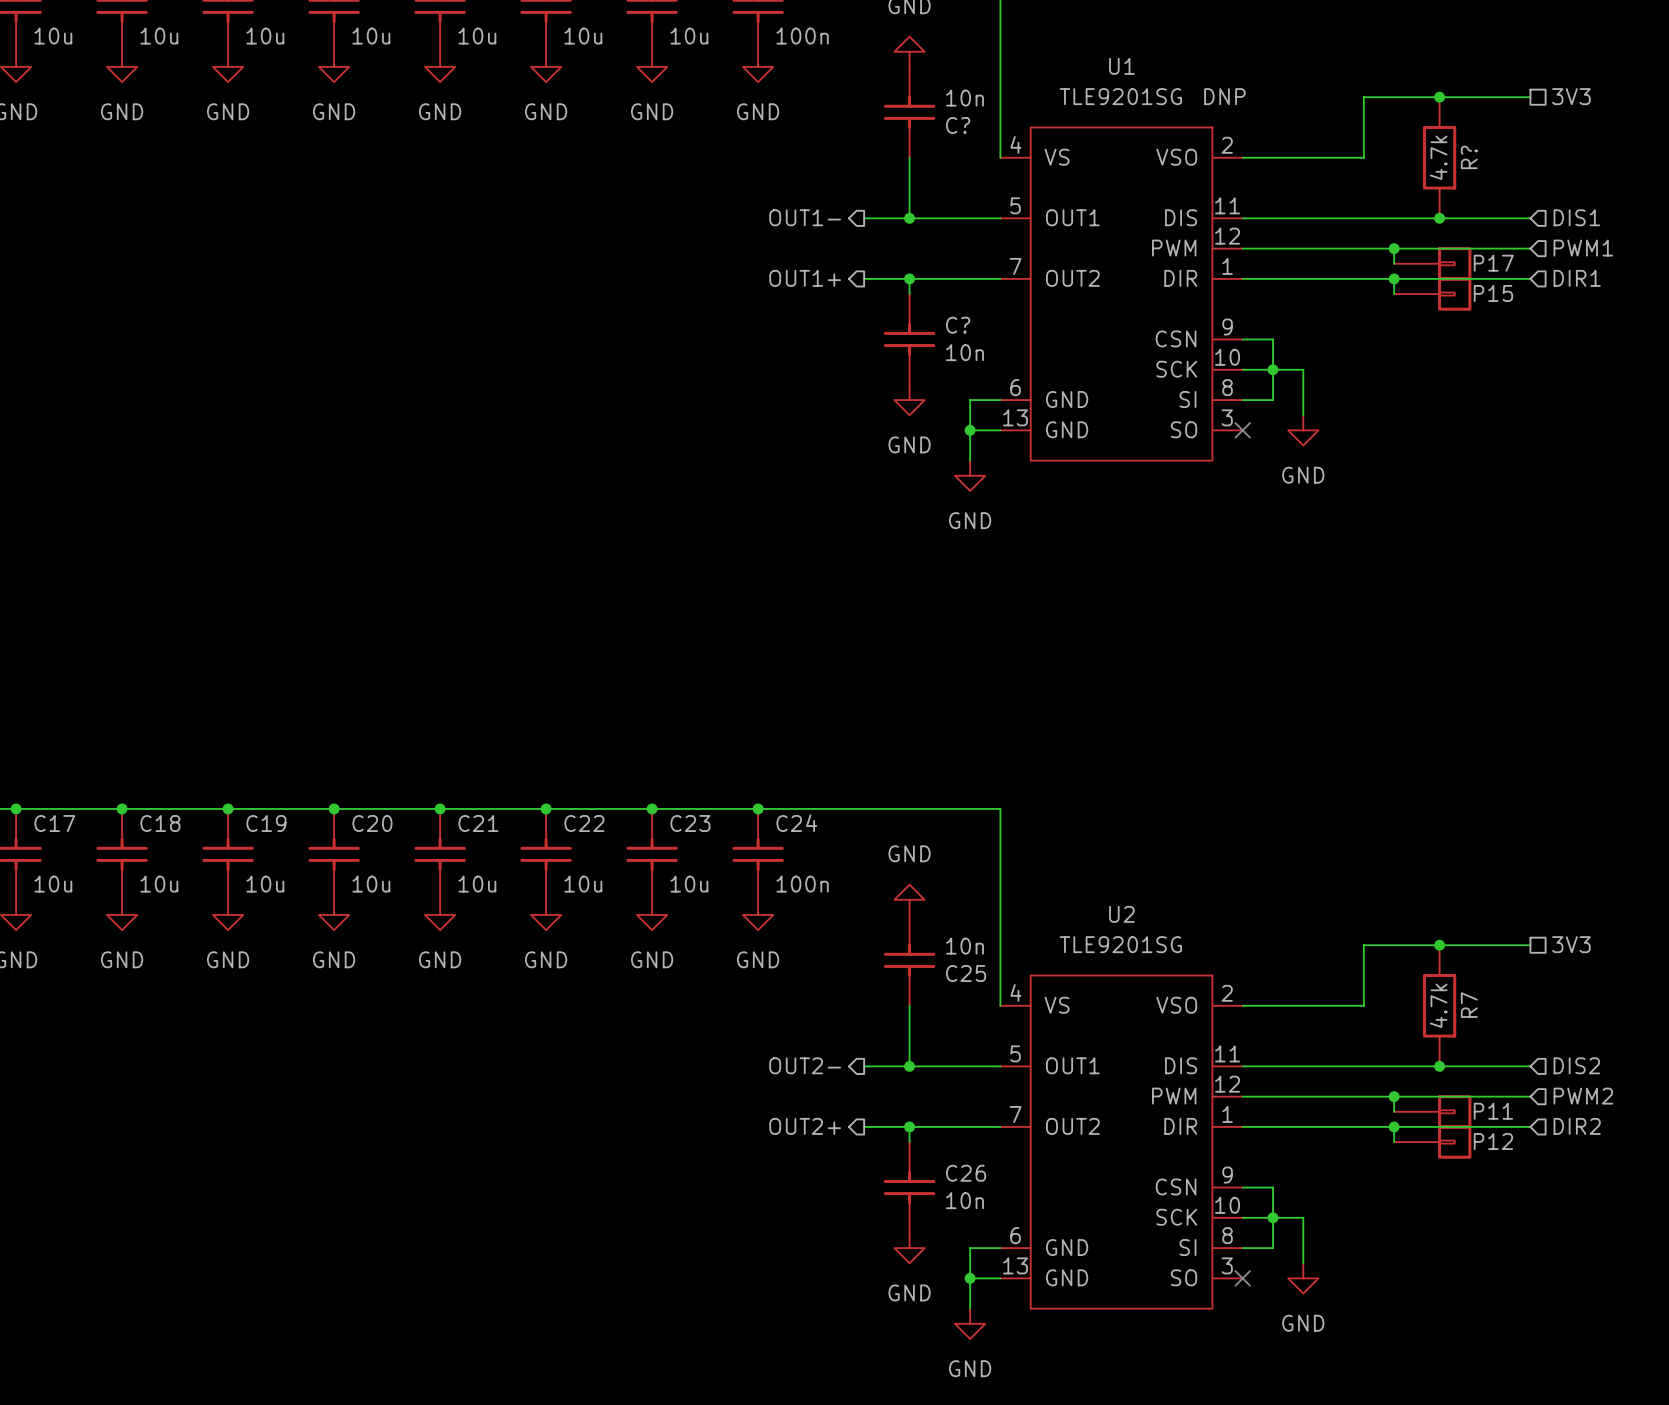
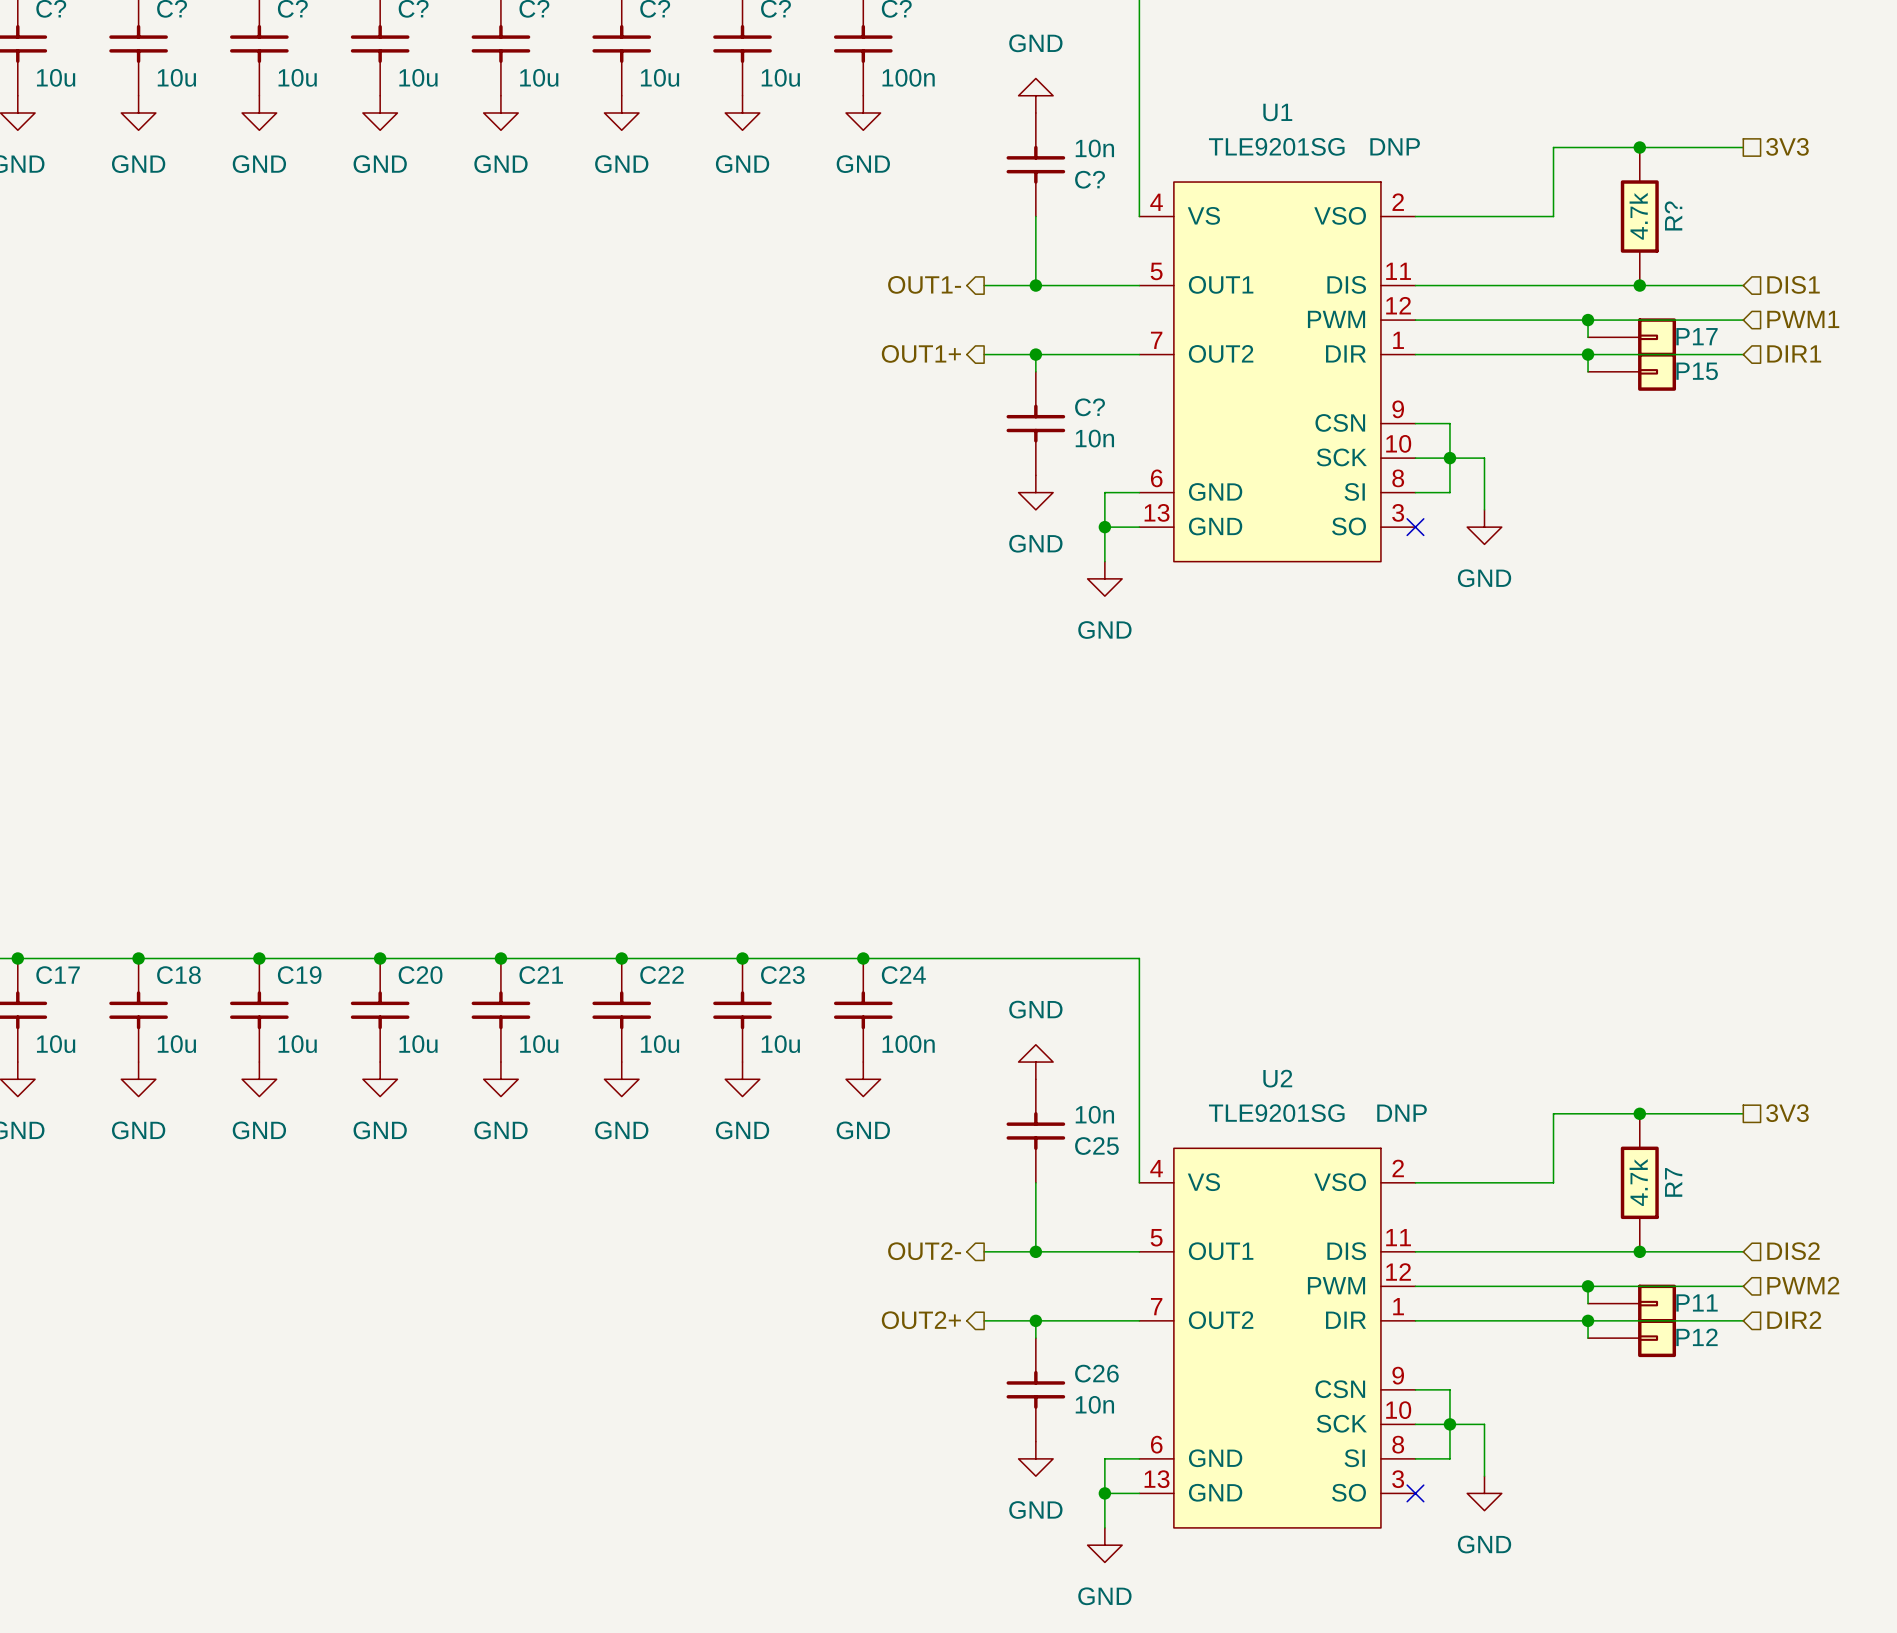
U2 text: none -> DNP (1402, 1113)

